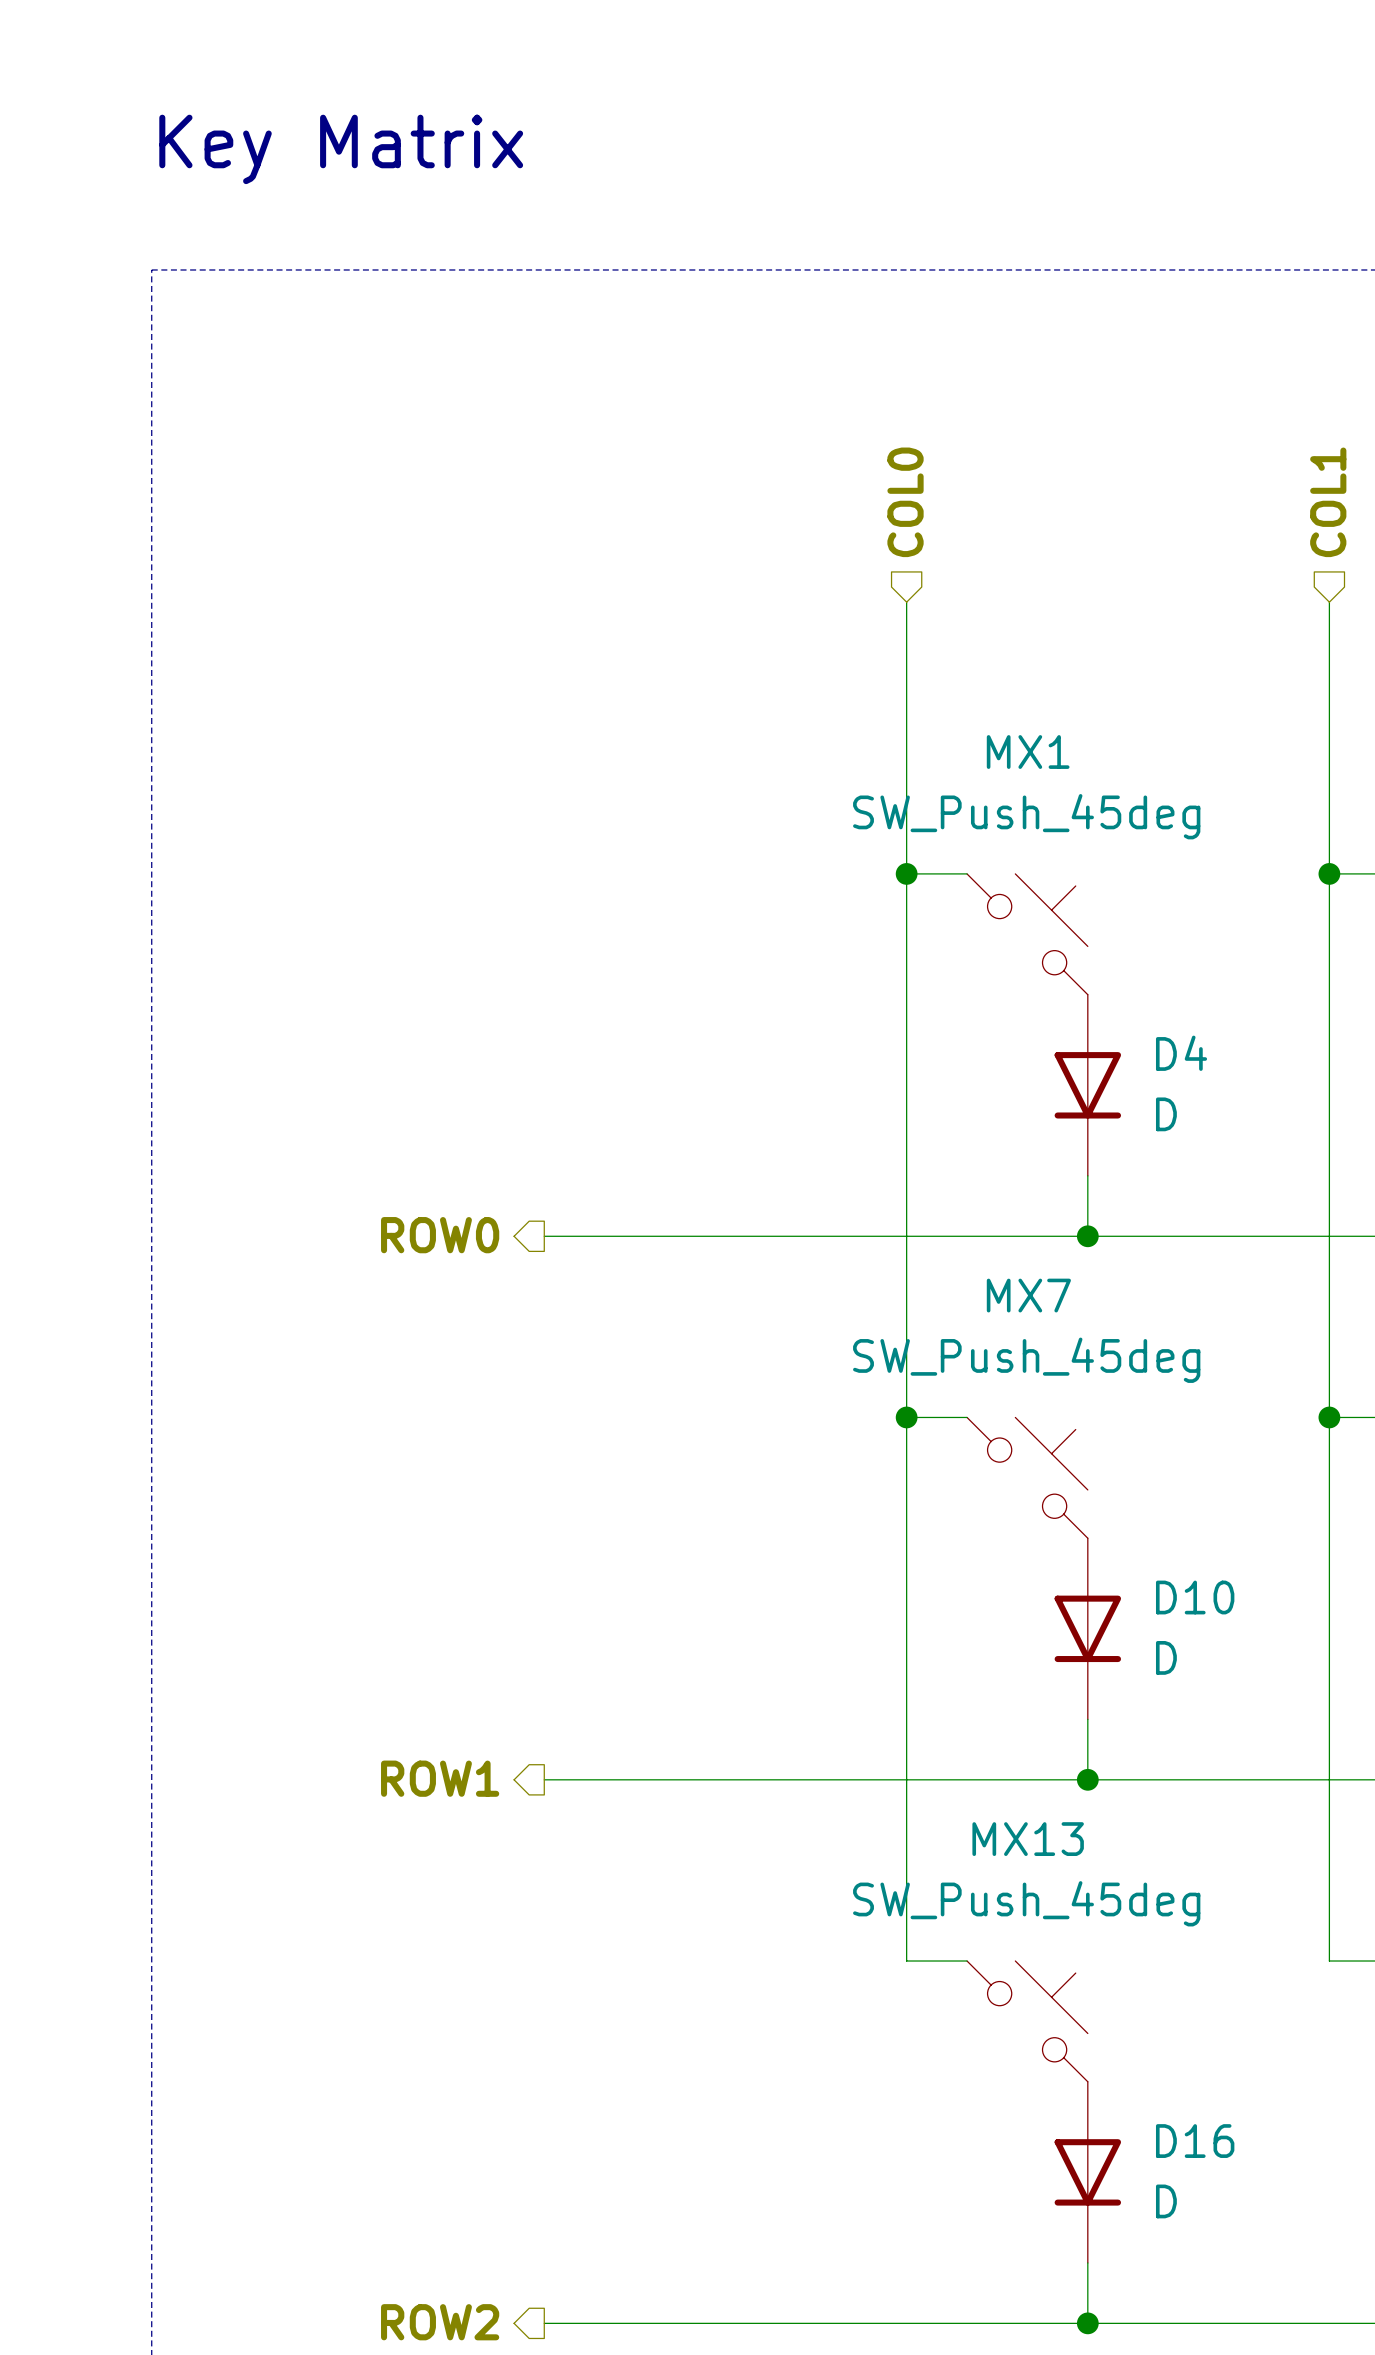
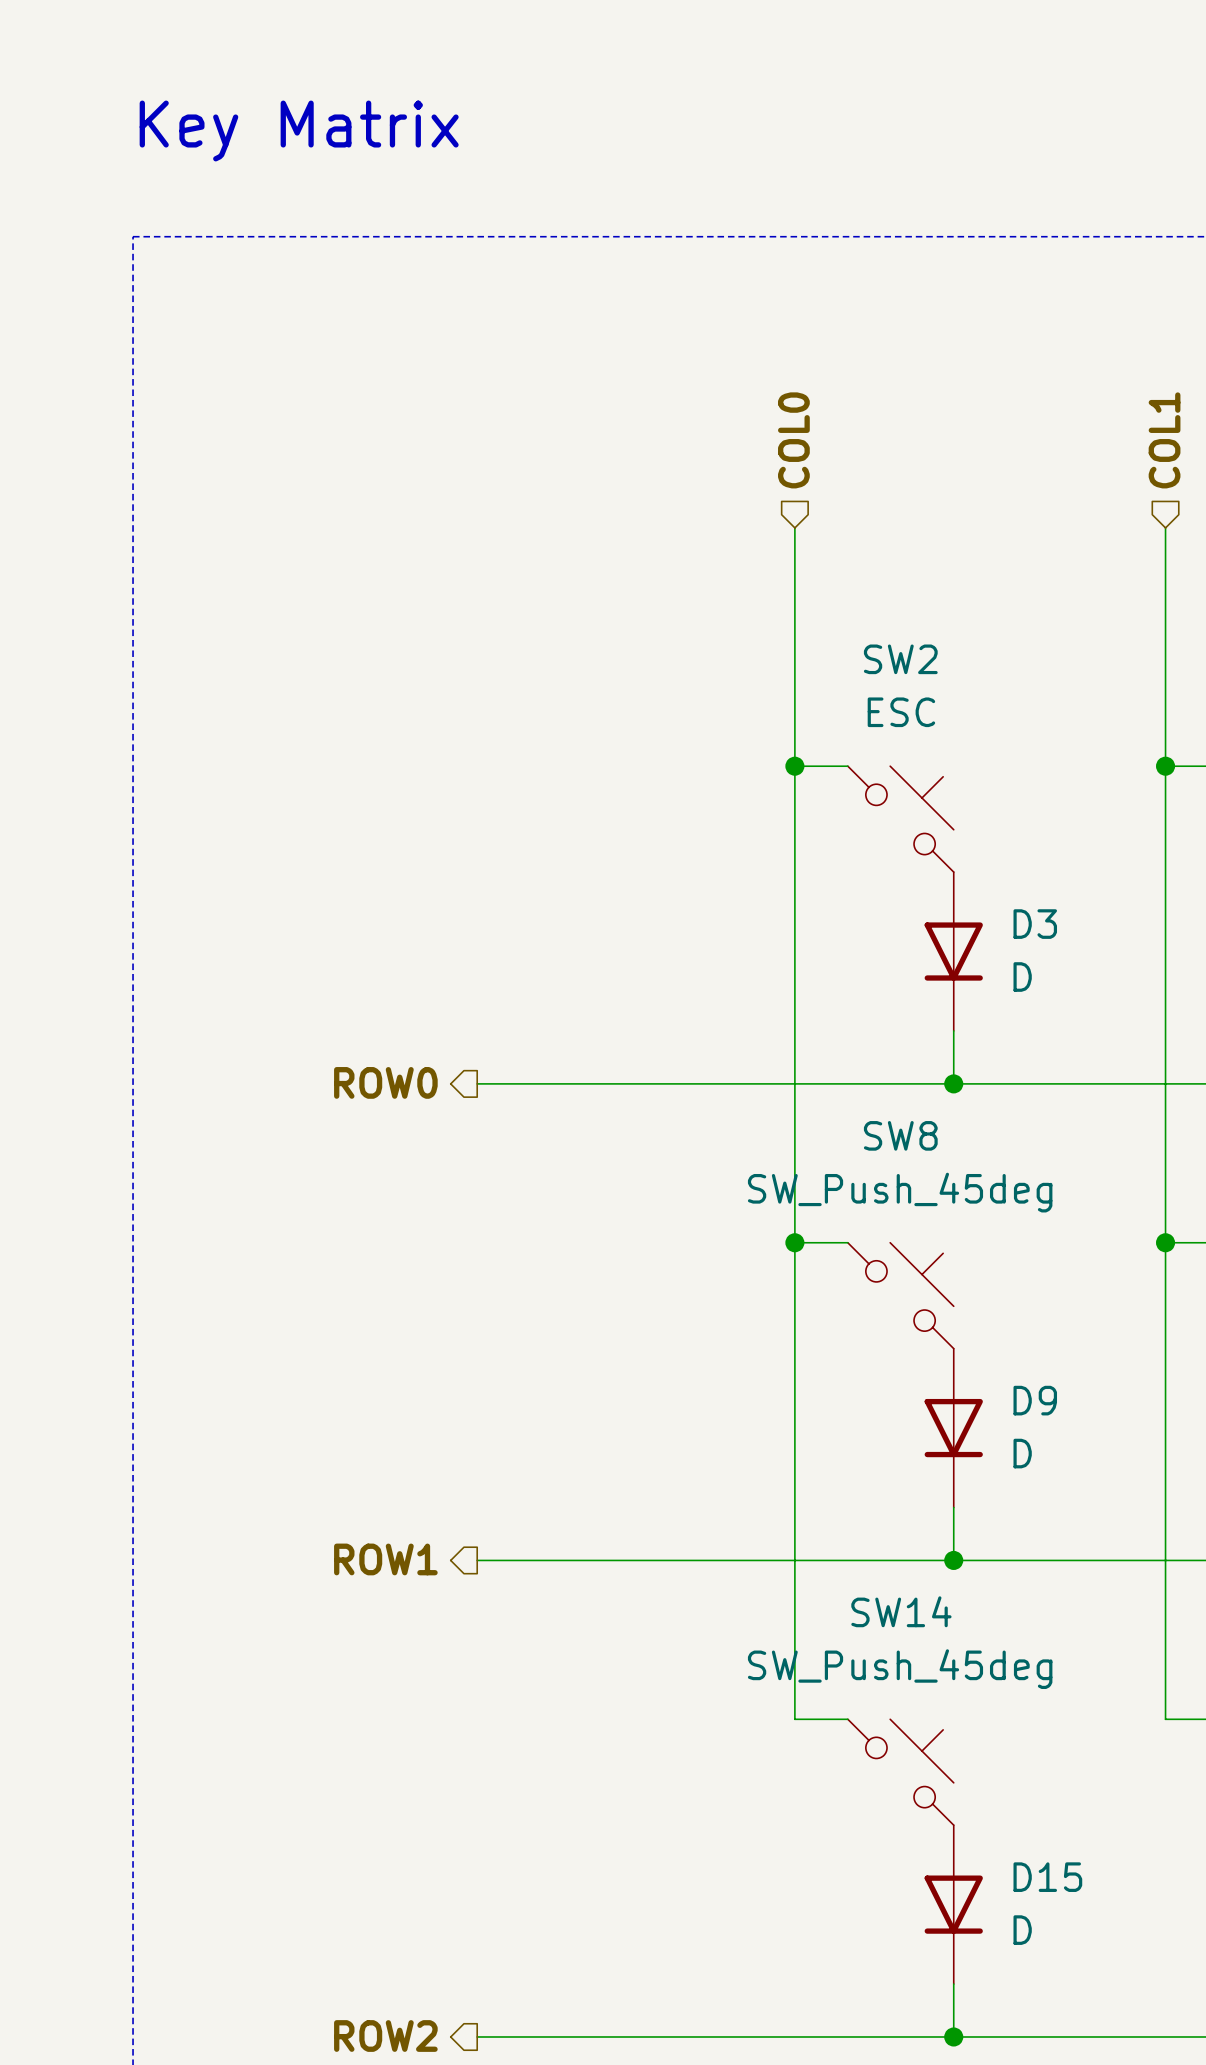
MX1 name: MX1 (1028, 752) -> SW2 (900, 659)
MX1 value: SW_Push_45deg (1026, 816) -> ESC (901, 712)
D4 name: D4 (1181, 1053) -> D3 (1035, 924)
MX7 name: MX7 (1028, 1295) -> SW8 (900, 1135)
D10 name: D10 (1195, 1597) -> D9 (1035, 1400)
MX13 name: MX13 (1028, 1839) -> SW14 (901, 1611)
D16 name: D16 (1195, 2141) -> D15 (1047, 1877)

